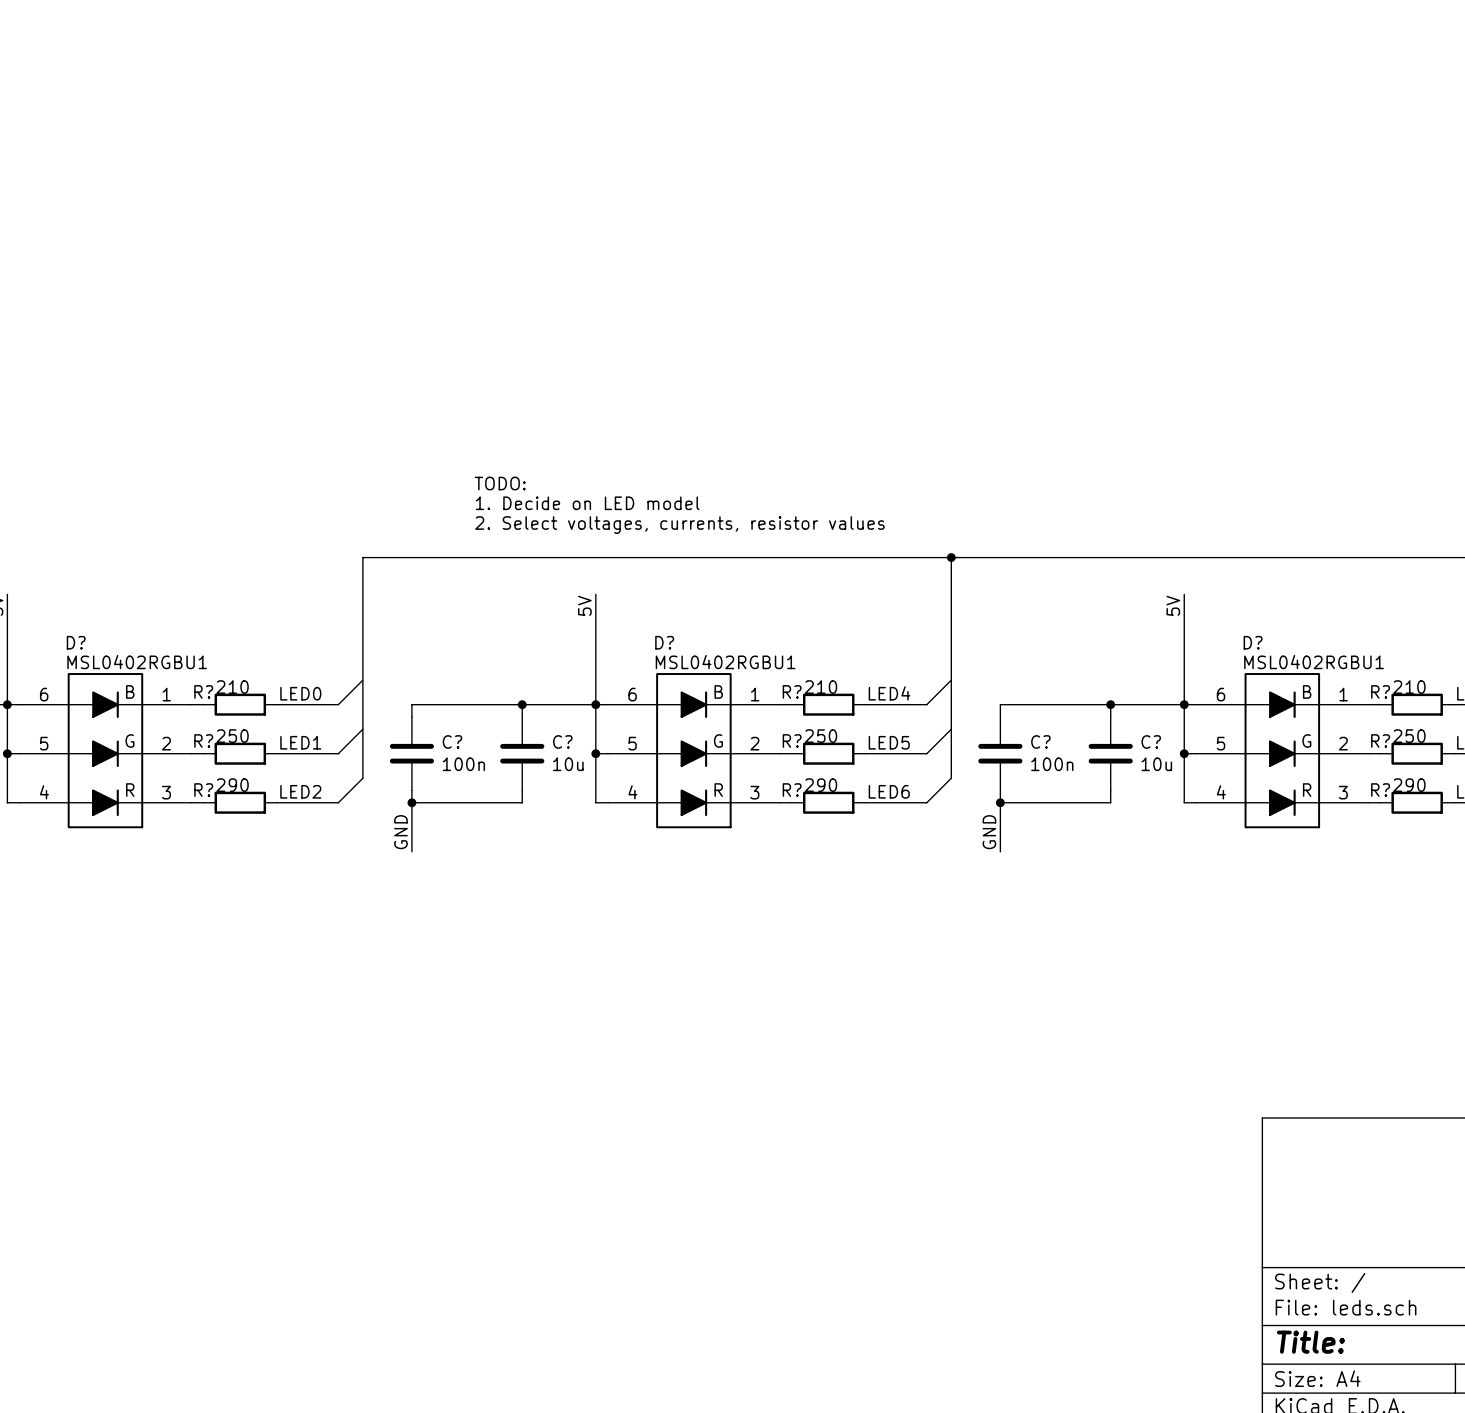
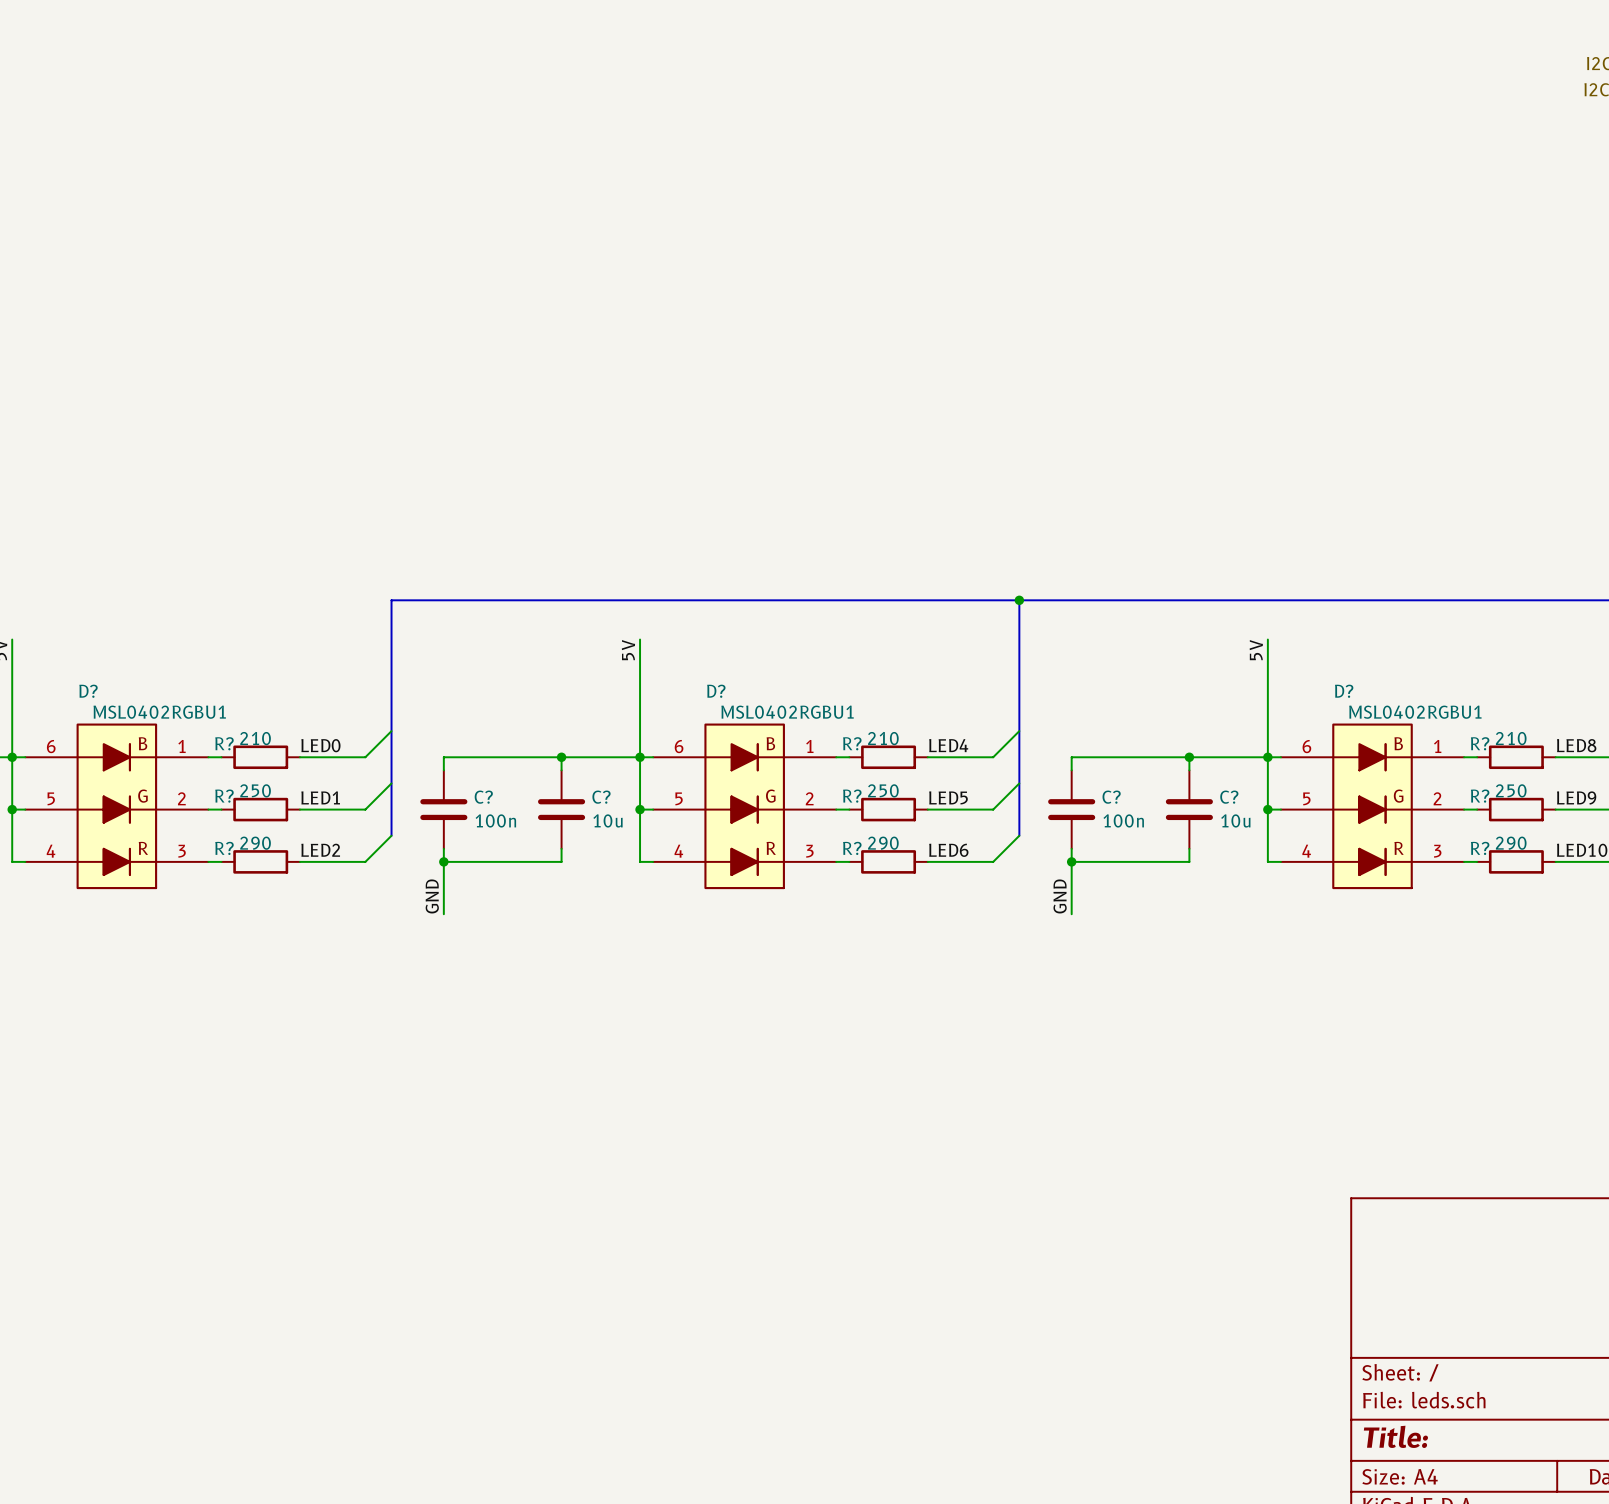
text: TODO: (500, 483) -> none
text: 1. Decide on LED model (587, 503) -> none
text: 2. Select voltages, currents, resistor values (679, 525) -> none

